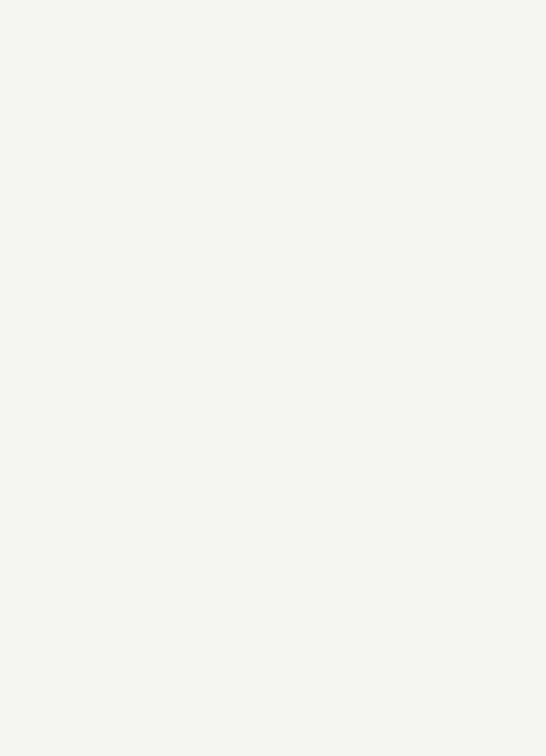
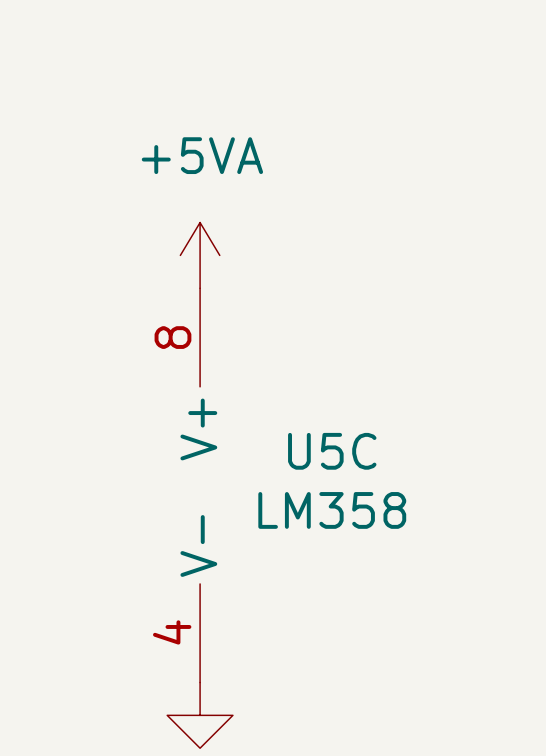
power symbol: none -> +5VA (200, 255)
U5C: none -> LM358 (200, 485)
power symbol: none -> (200, 715)

